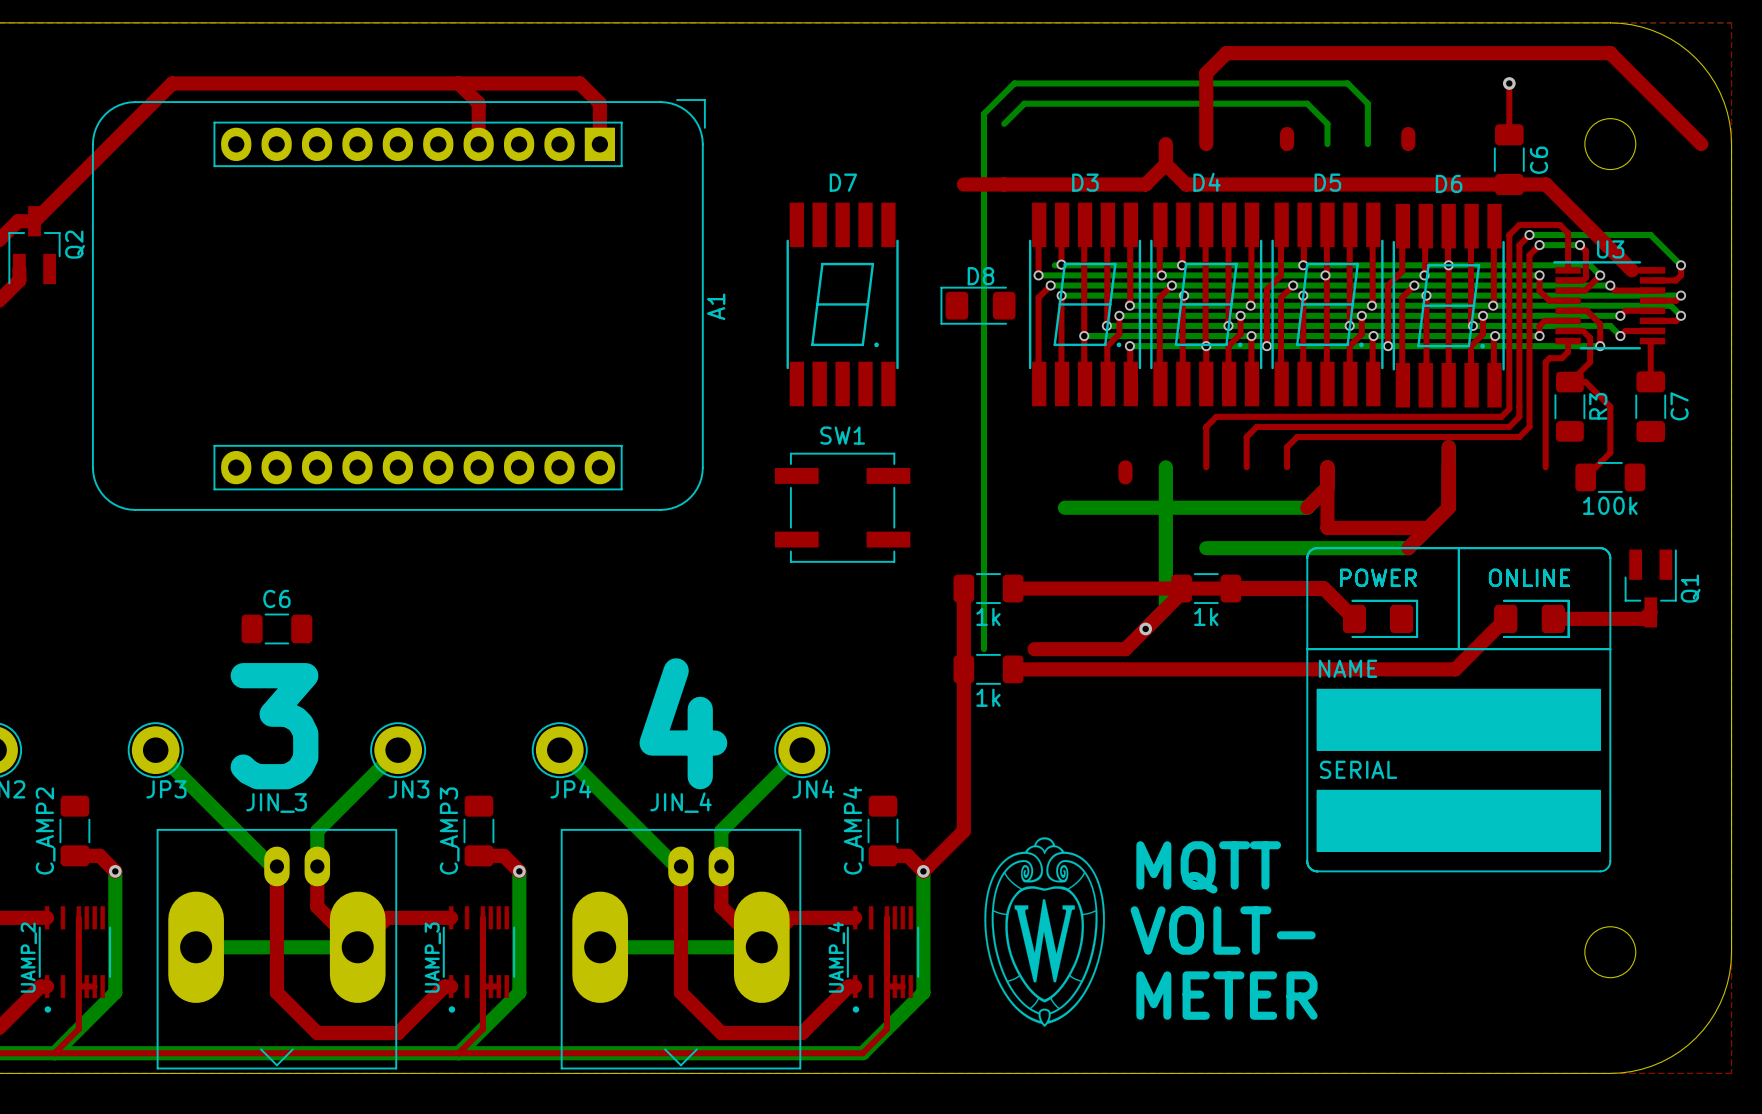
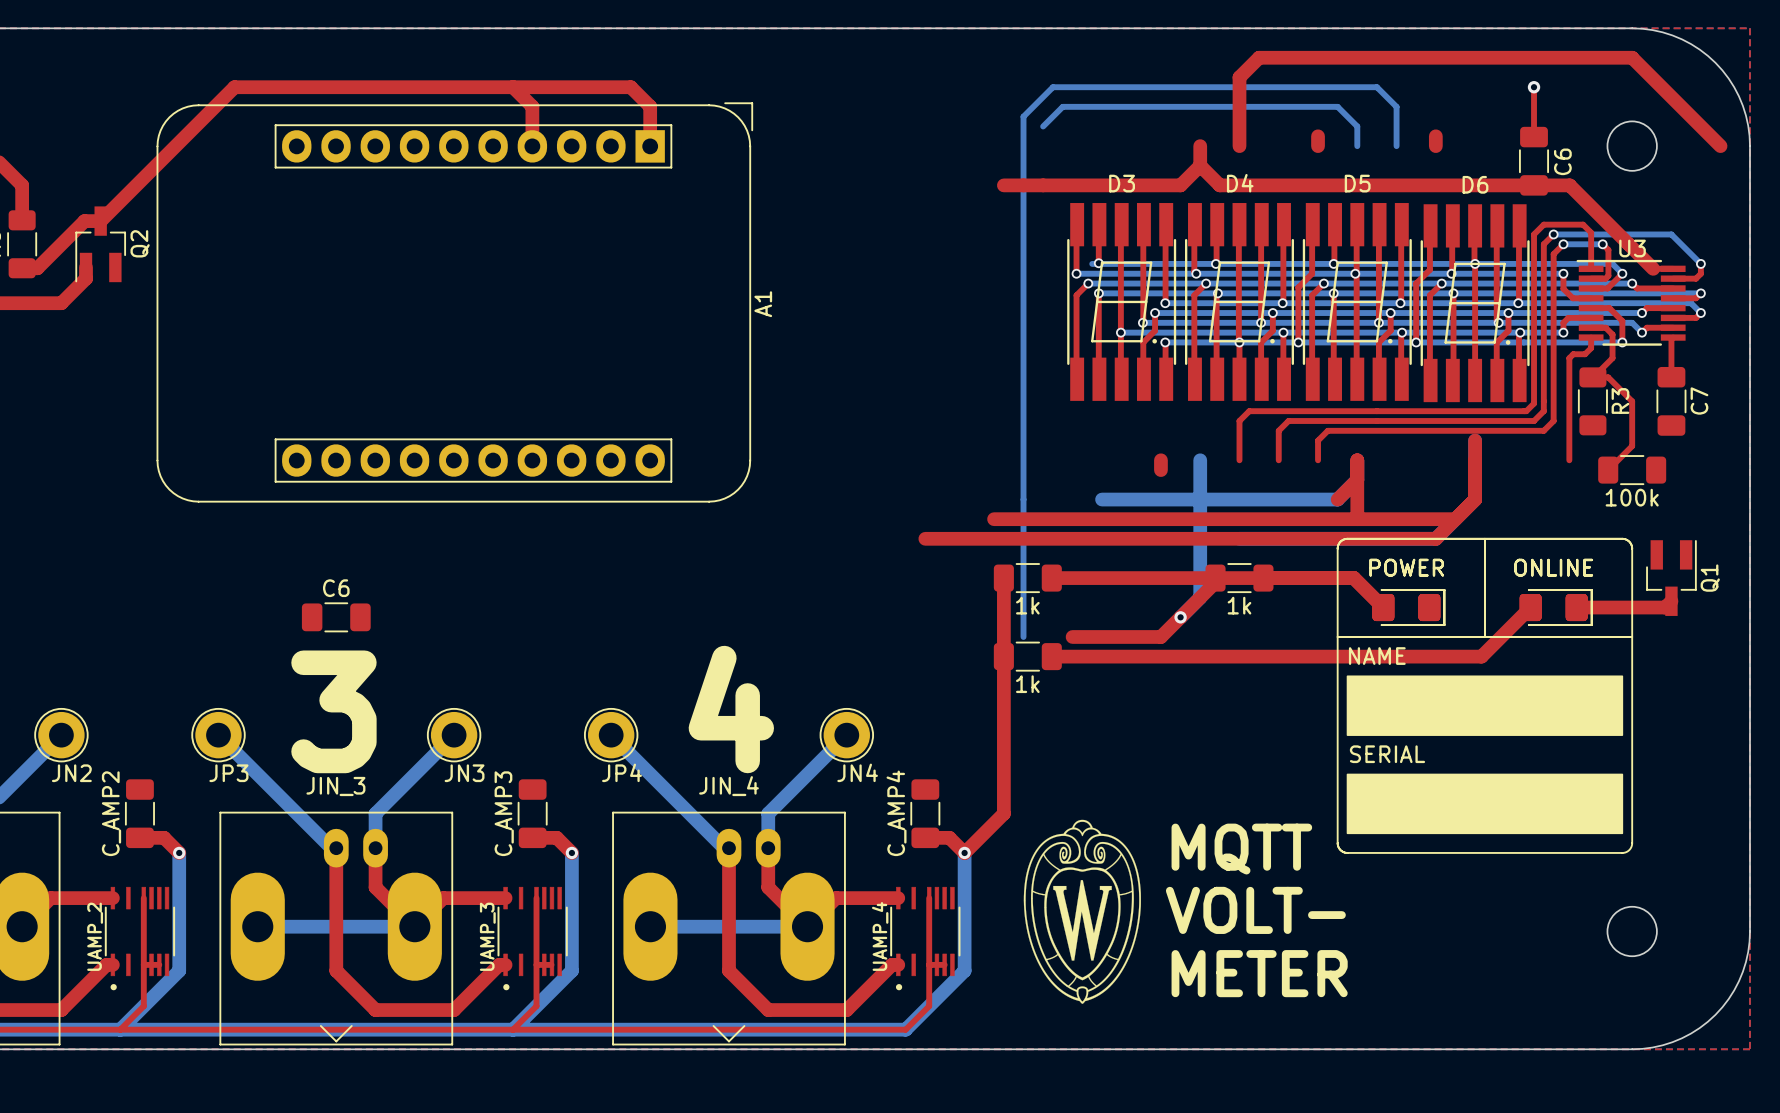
D7: (842, 304) -> none
D8: (978, 305) -> none
SW1: (842, 507) -> none
top track: none -> (994, 519) (1357, 519)
top track: none -> (925, 538) (1435, 538)

